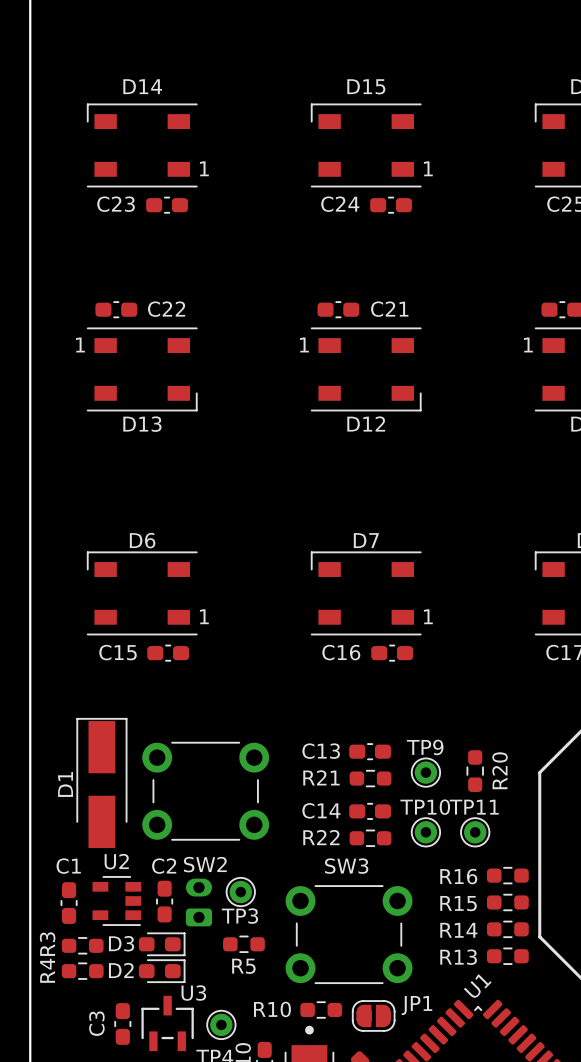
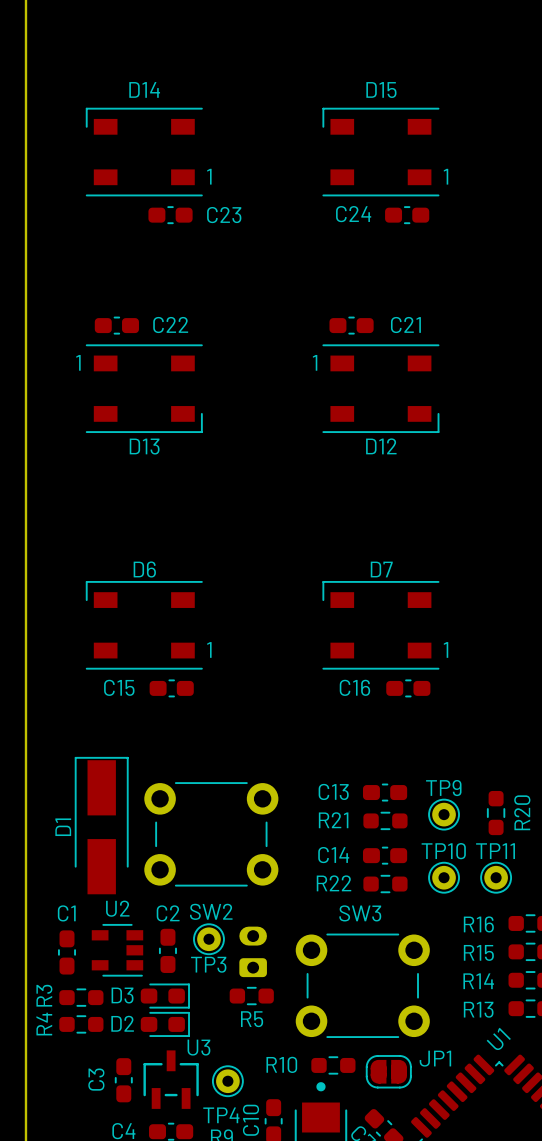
C23 name position: C23 (116, 204) -> C23 (224, 215)
TP3 position: (240, 892) -> (208, 939)
part position: (198, 902) -> (253, 951)

